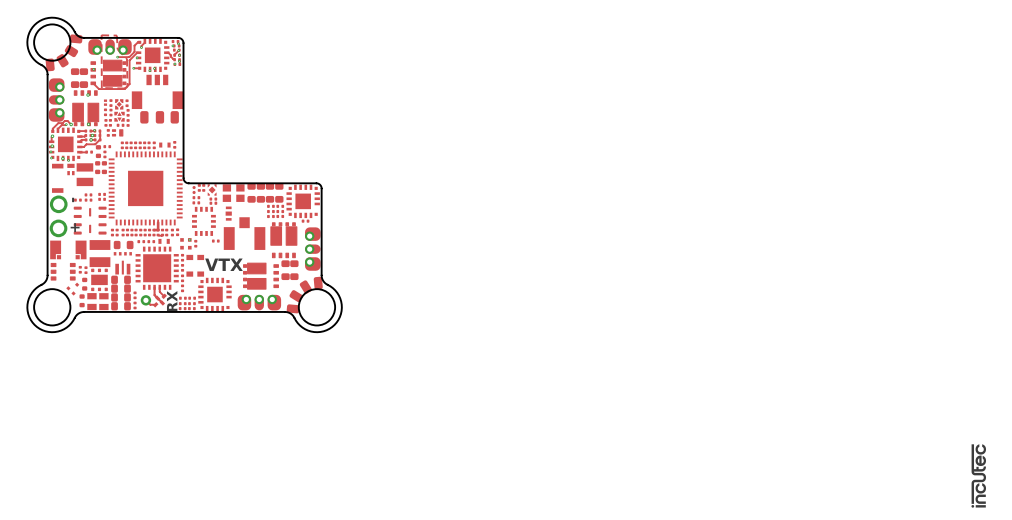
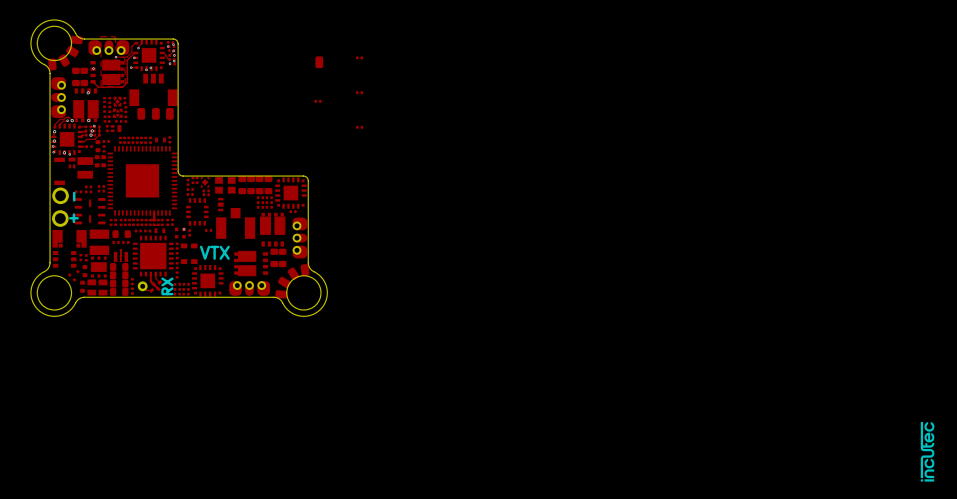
part: none -> (359, 57)
part: none -> (319, 62)
part: none -> (359, 92)
part: none -> (318, 101)
part: none -> (359, 127)

